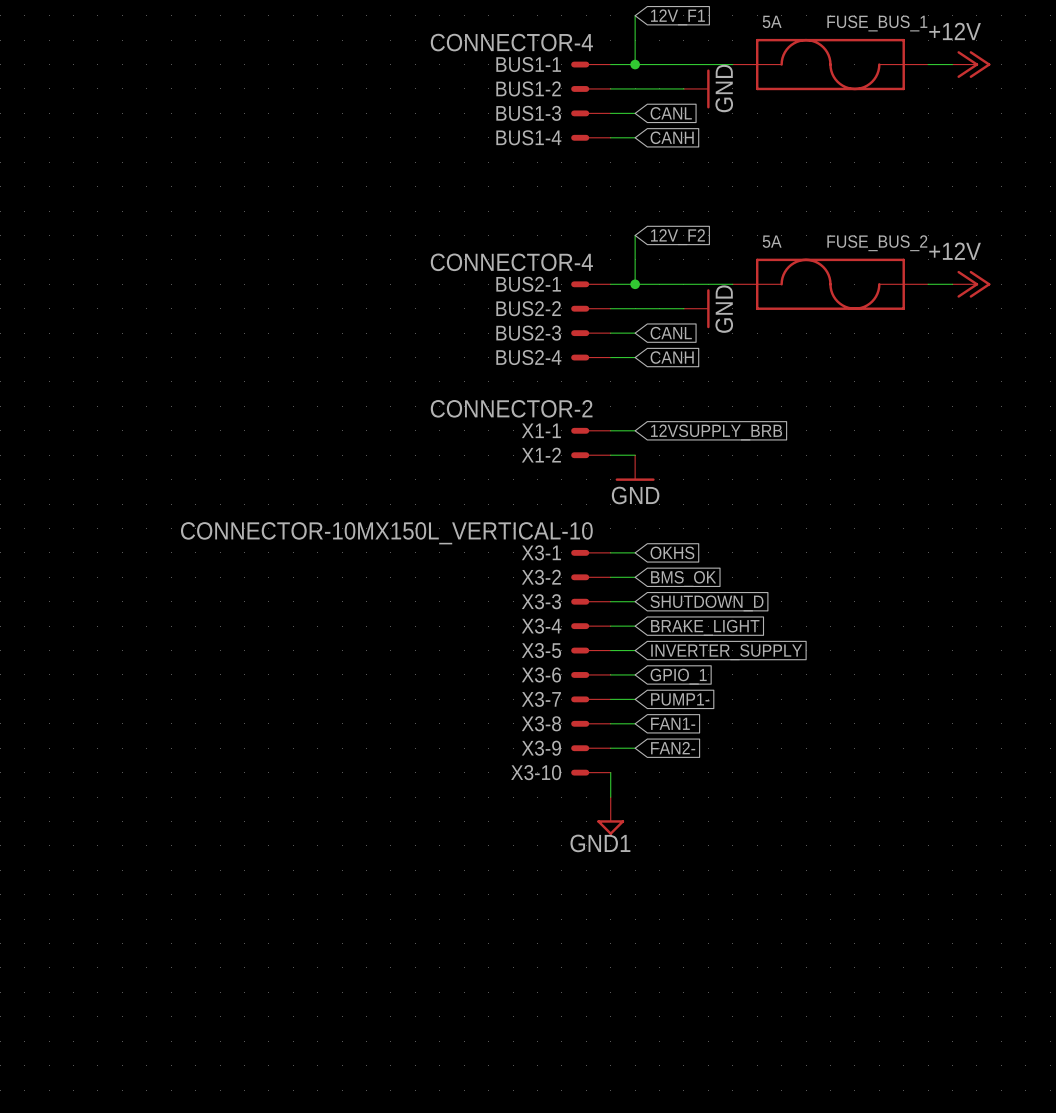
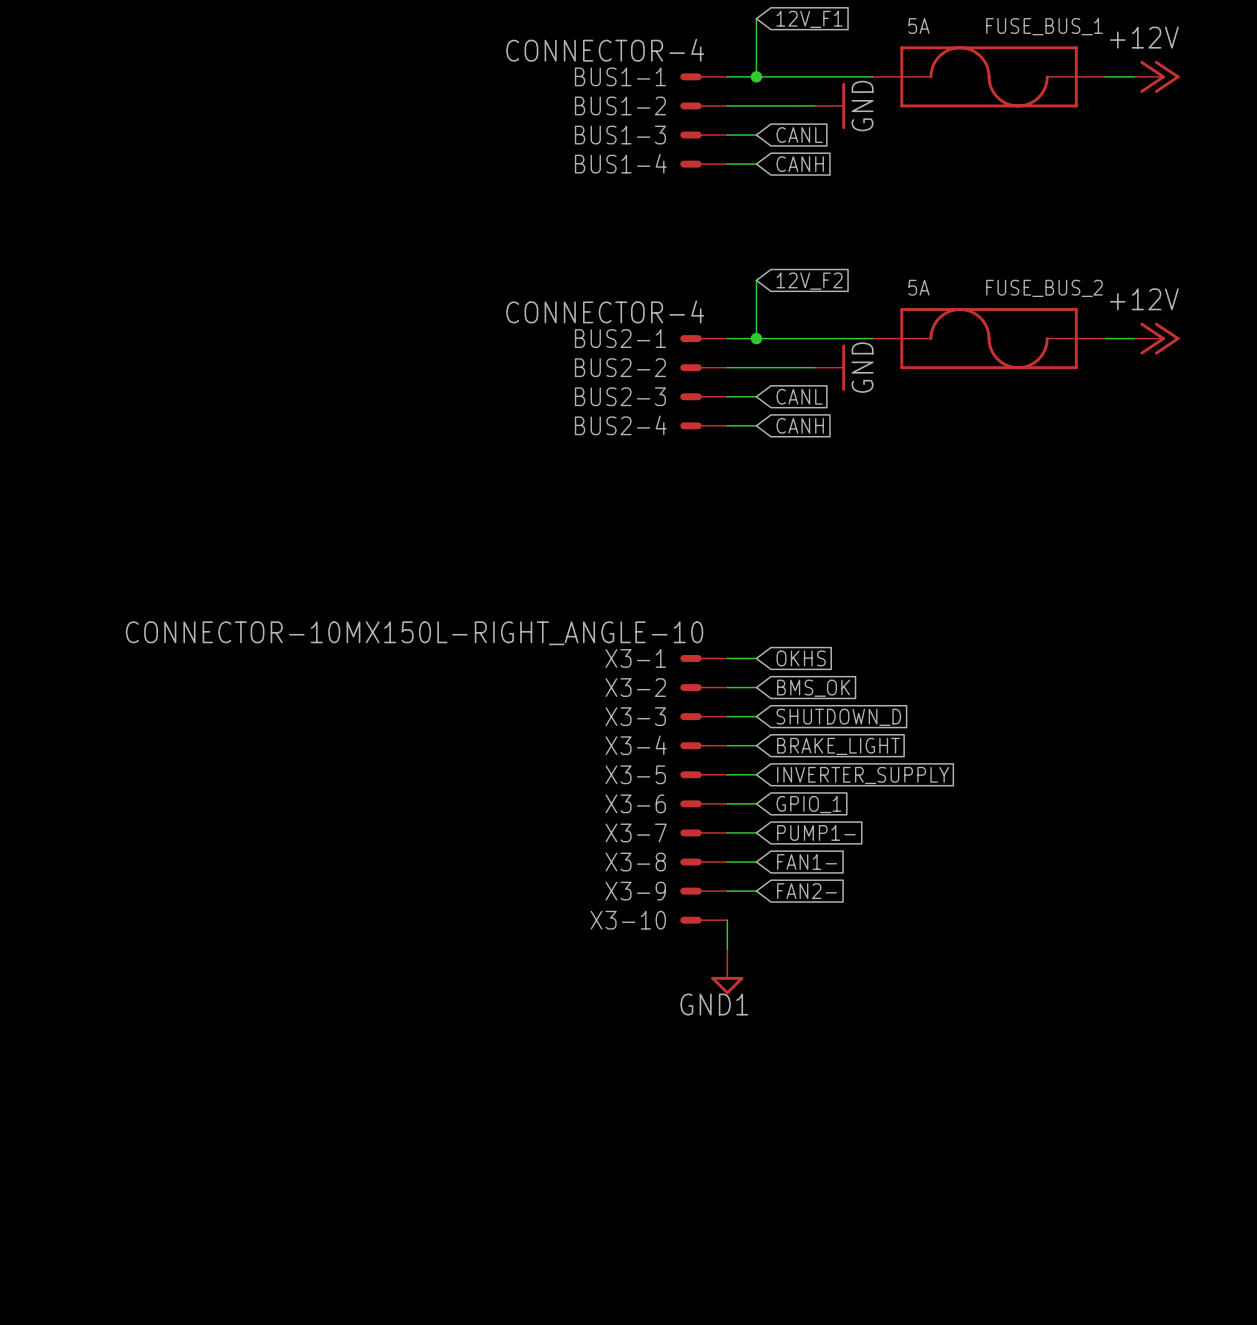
X1-1: CONNECTOR-2 (590, 430) -> none
wire: (610, 430) (635, 430) -> none
global label: 12VSUPPLY_BRB (716, 432) -> none
X1-2: (590, 455) -> none
wire: (610, 455) (635, 455) -> none
power symbol: GND (635, 468) -> none
X3-1 value: CONNECTOR-10MX150L_VERTICAL-10 (386, 533) -> CONNECTOR-10MX150L-RIGHT_ANGLE-10 (414, 633)

